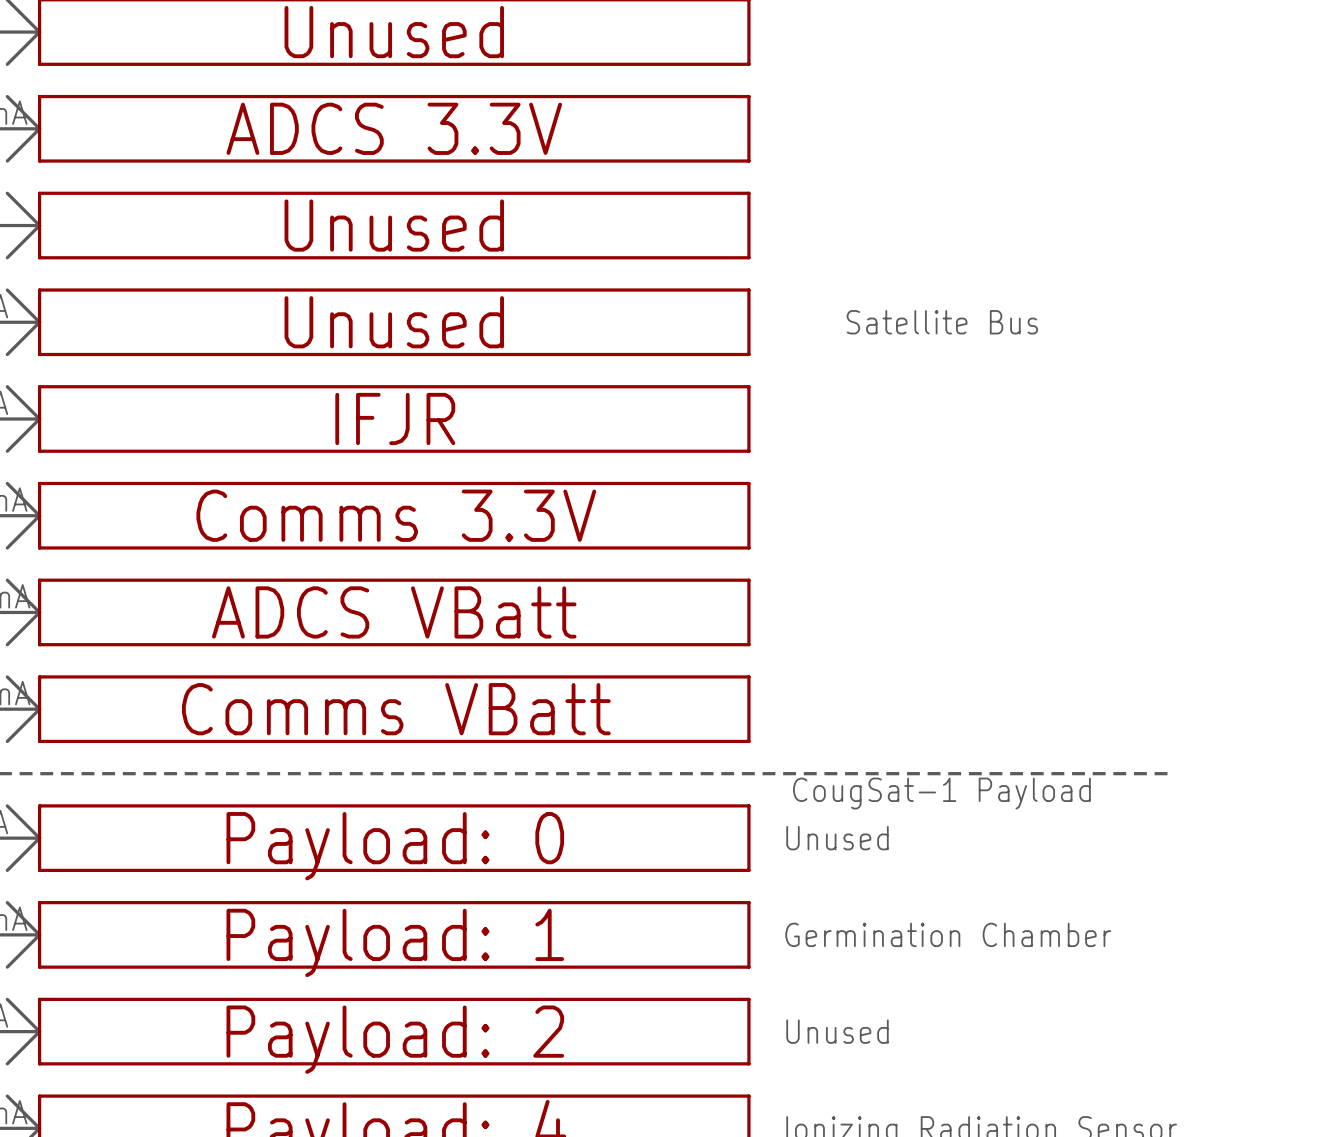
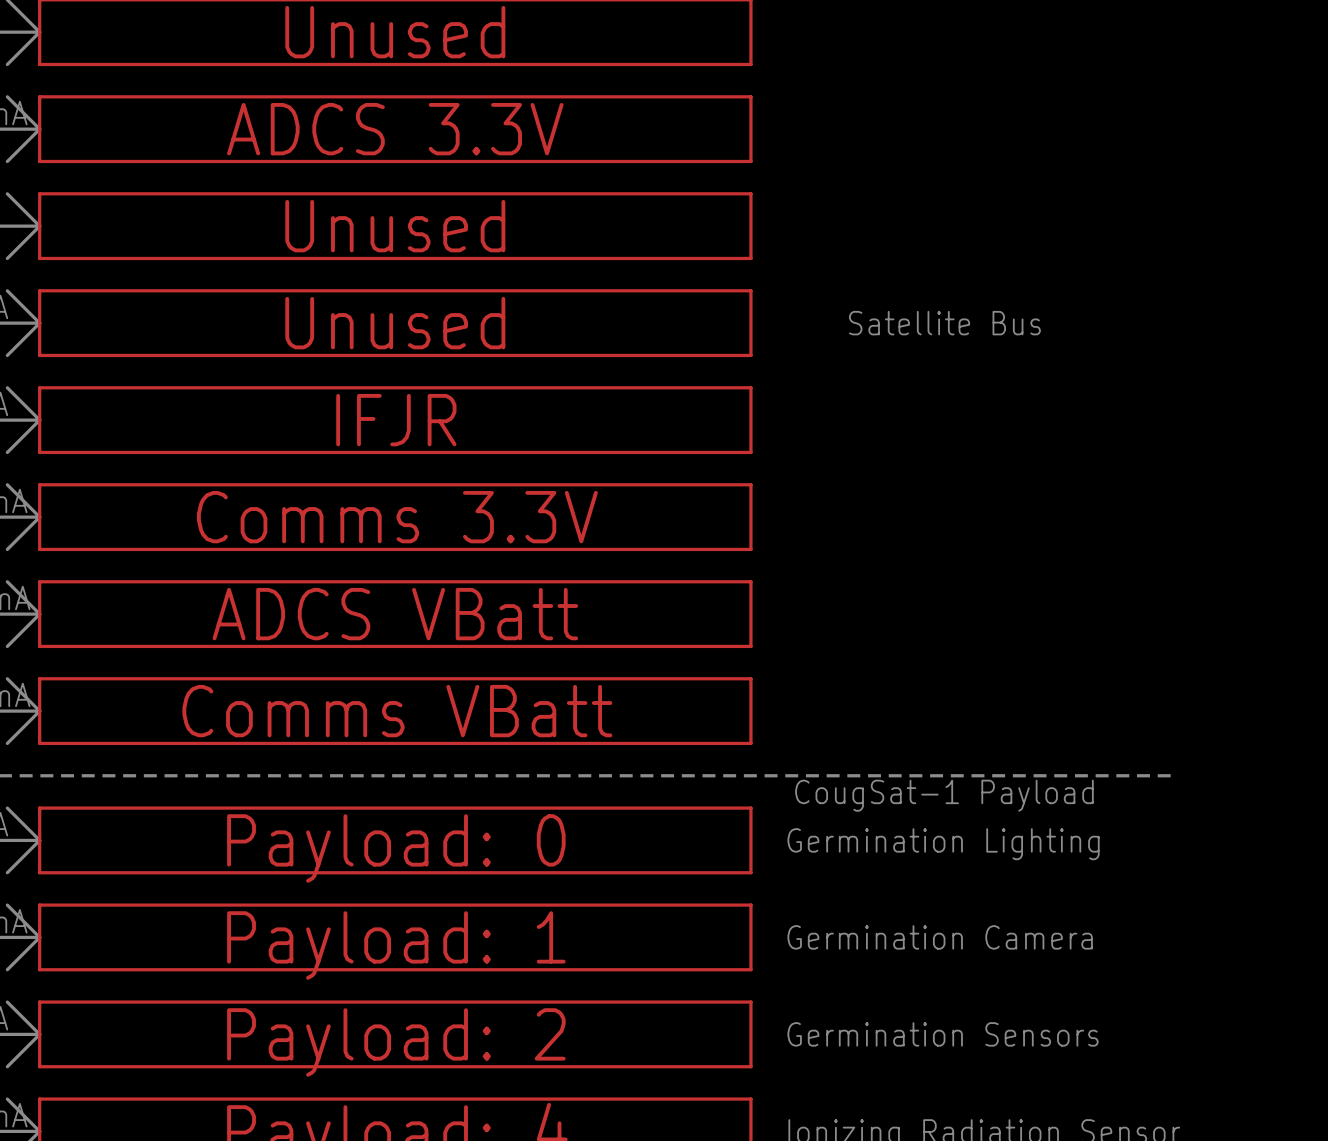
text: Unused (837, 838) -> Germination Lighting (943, 844)
text: Germination Chamber (948, 934) -> Germination Camera (940, 937)
text: Unused (837, 1031) -> Germination Sensors (943, 1034)

